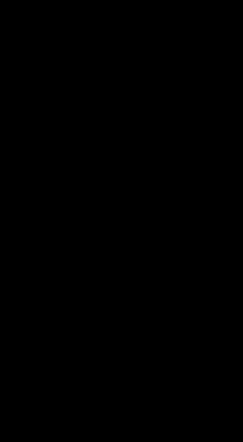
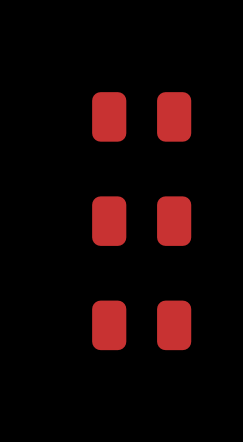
part: none -> (141, 116)
part: none -> (141, 221)
part: none -> (141, 325)

